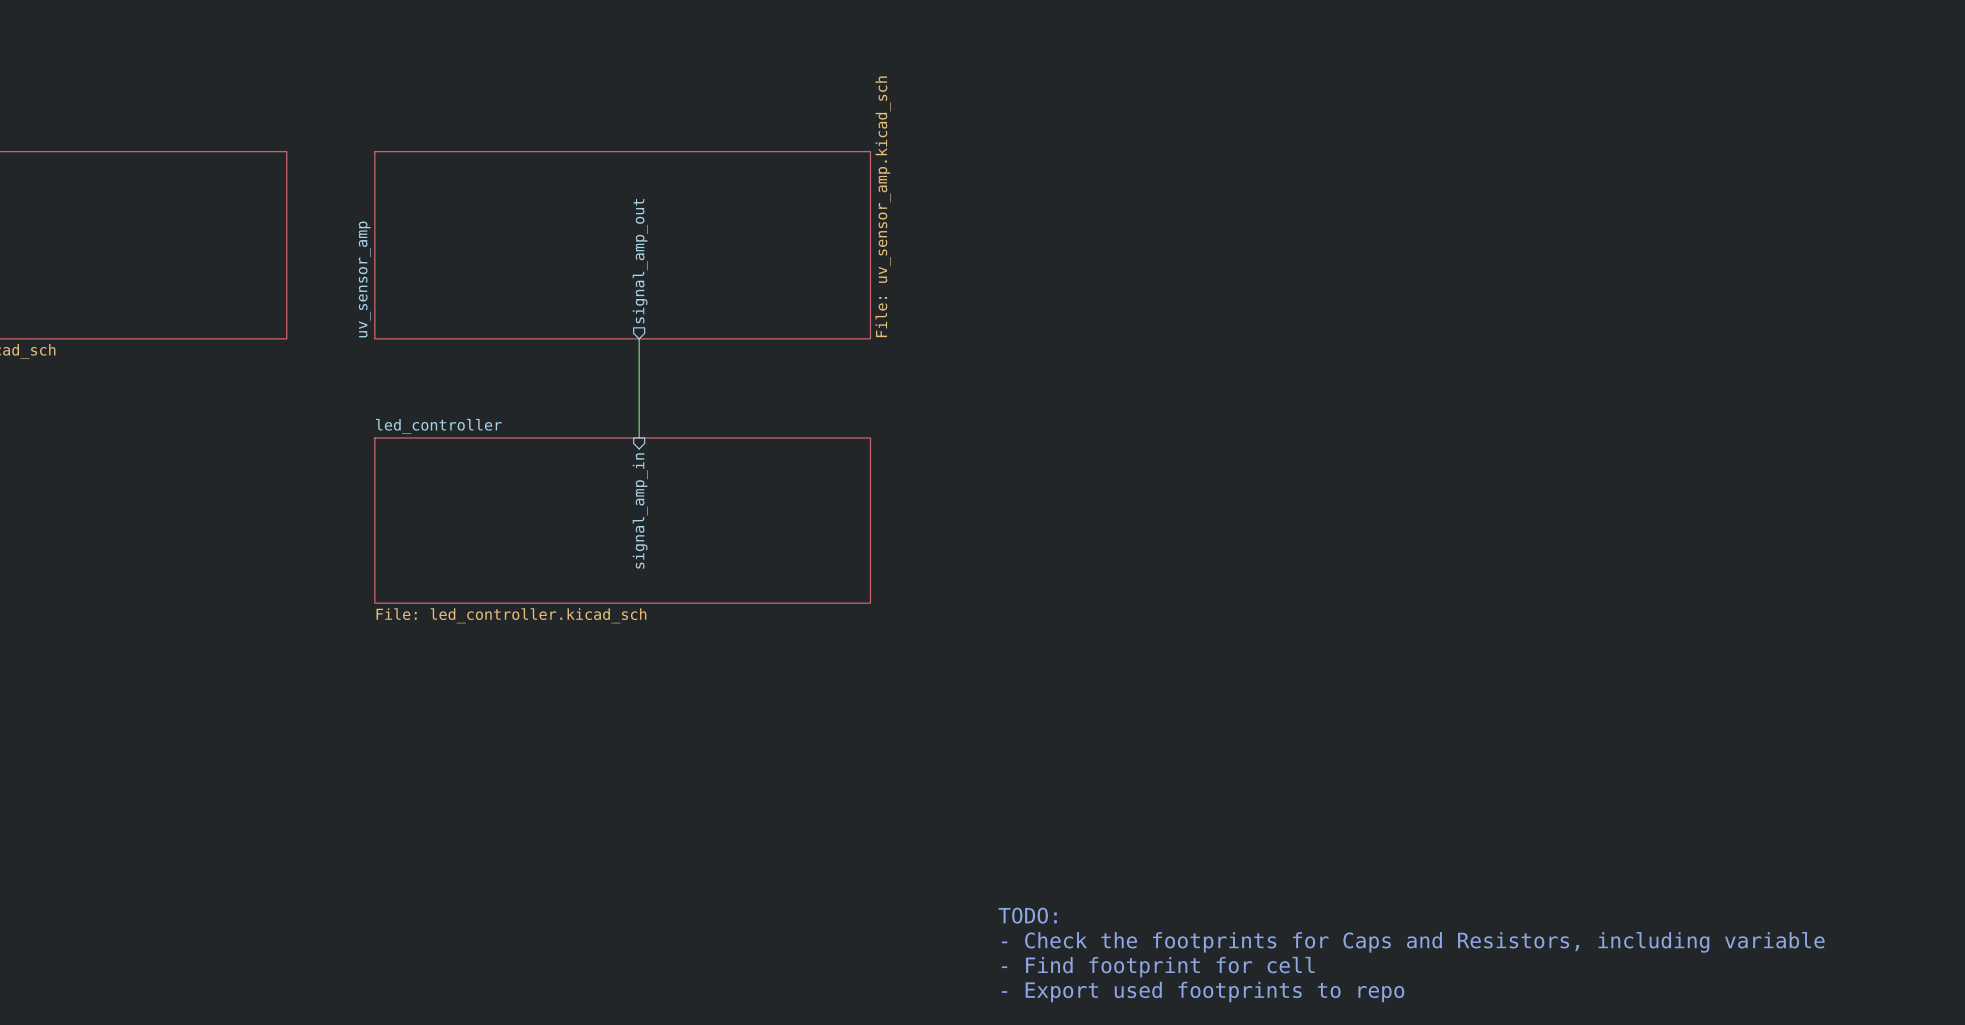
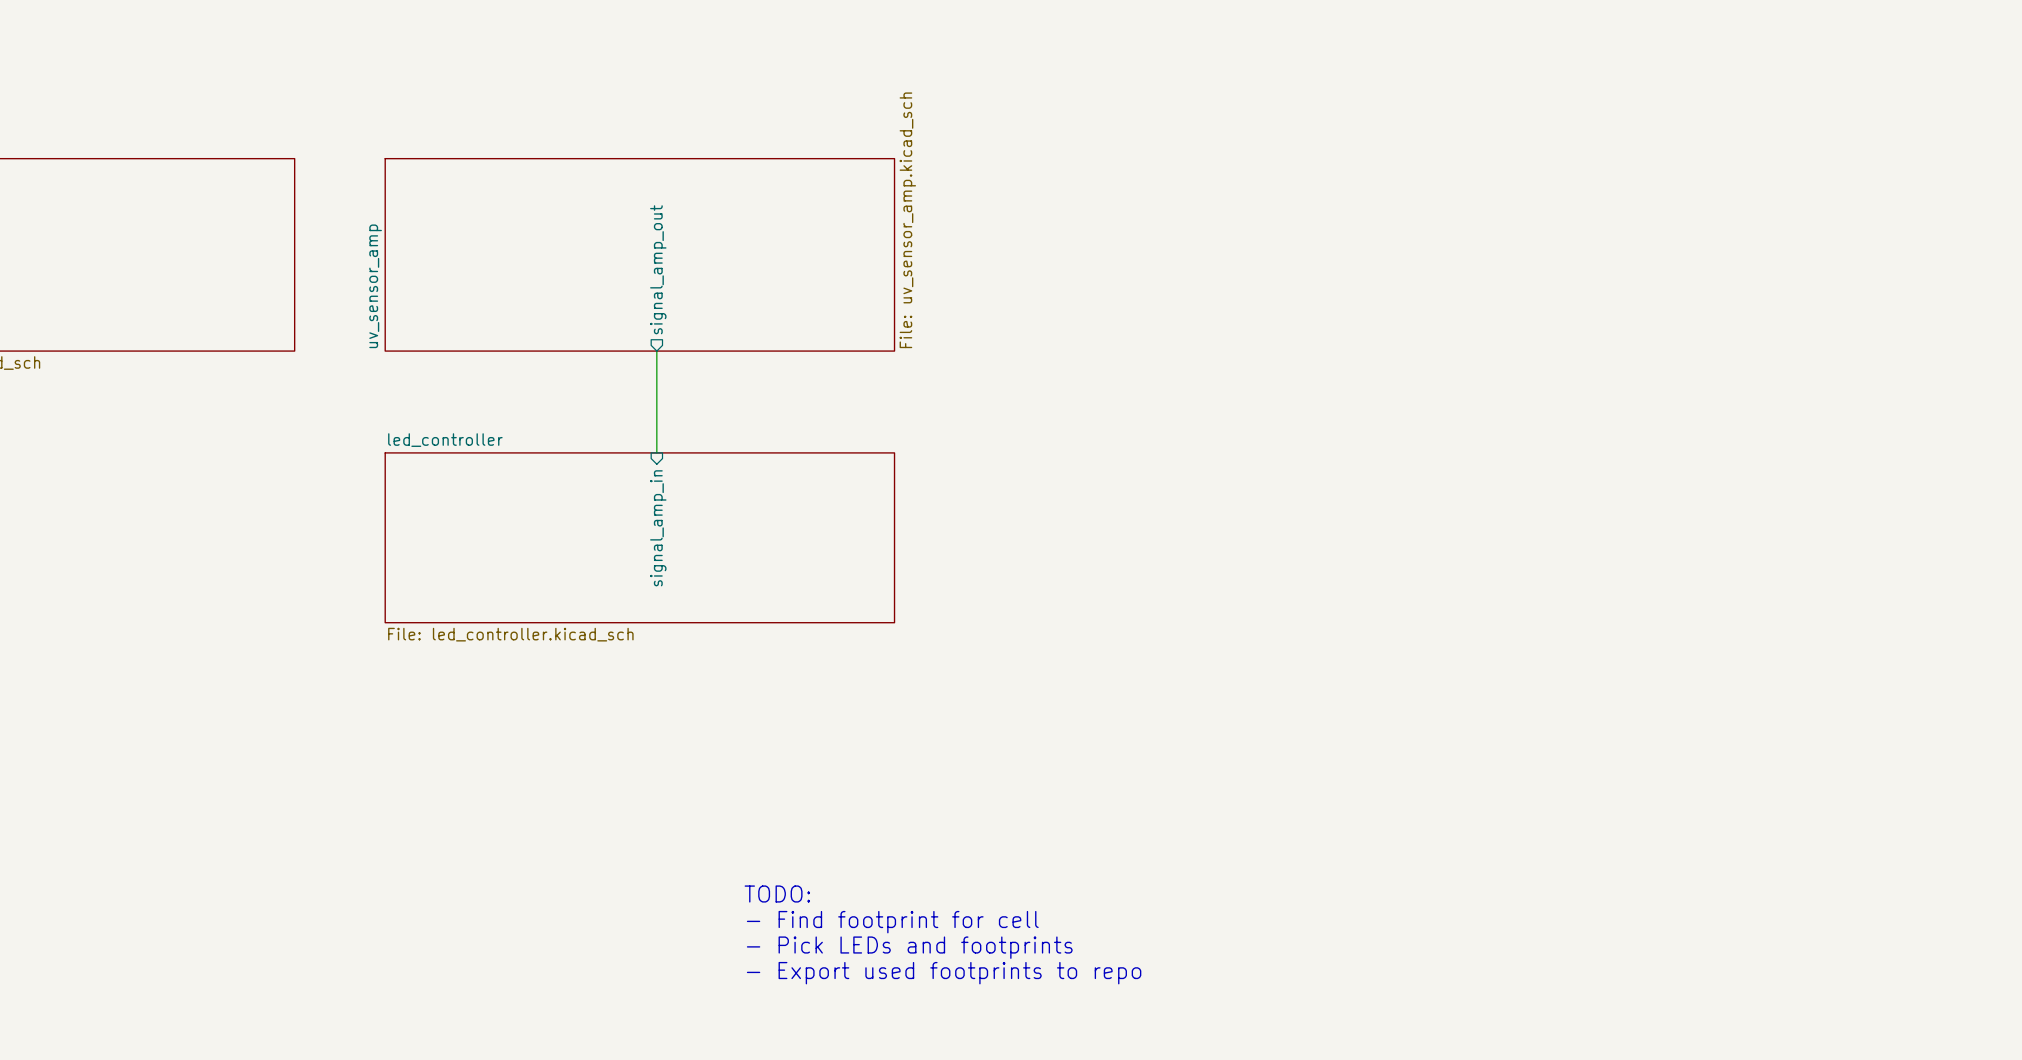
text: none -> TODO: (777, 893)
text: none -> - Find footprint for cell (892, 922)
text: TODO: (1027, 915) -> none
text: none -> - Pick LEDs and footprints (909, 947)
text: - Check the footprints for Caps and Resistors, including variable (1413, 942) -> none
text: none -> - Export used footprints to repo (944, 973)
text: - Find footprint for cell (1158, 967) -> none
text: - Export used footprints to repo (1203, 991) -> none

